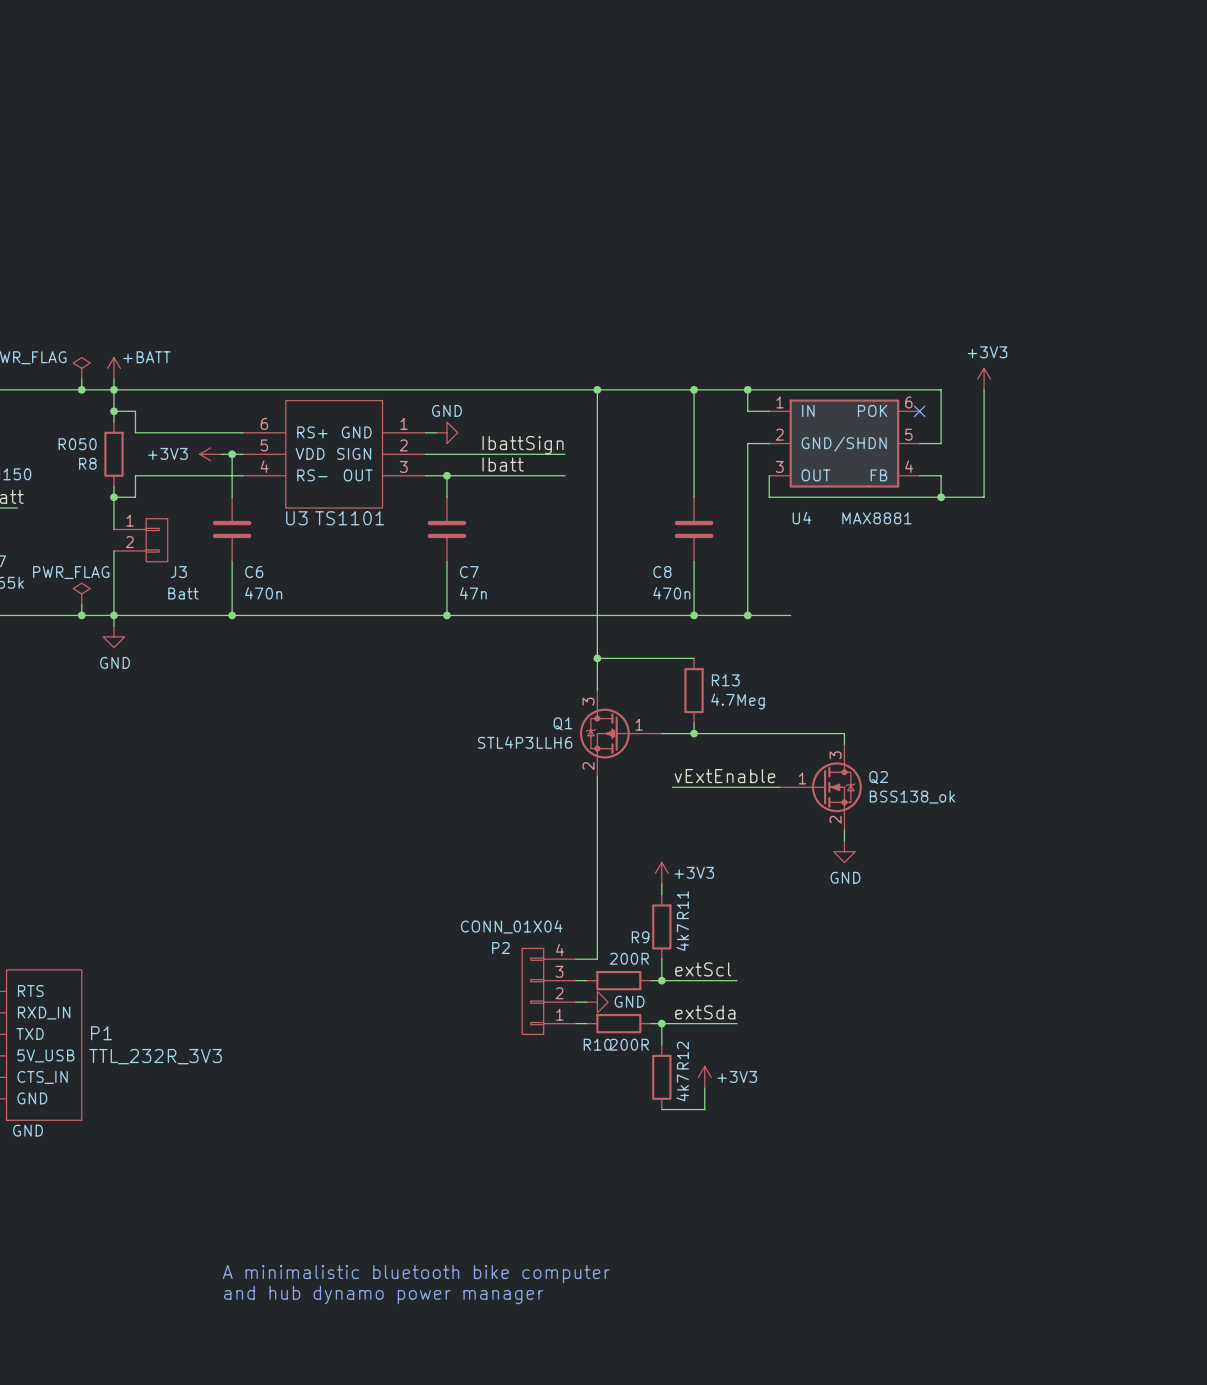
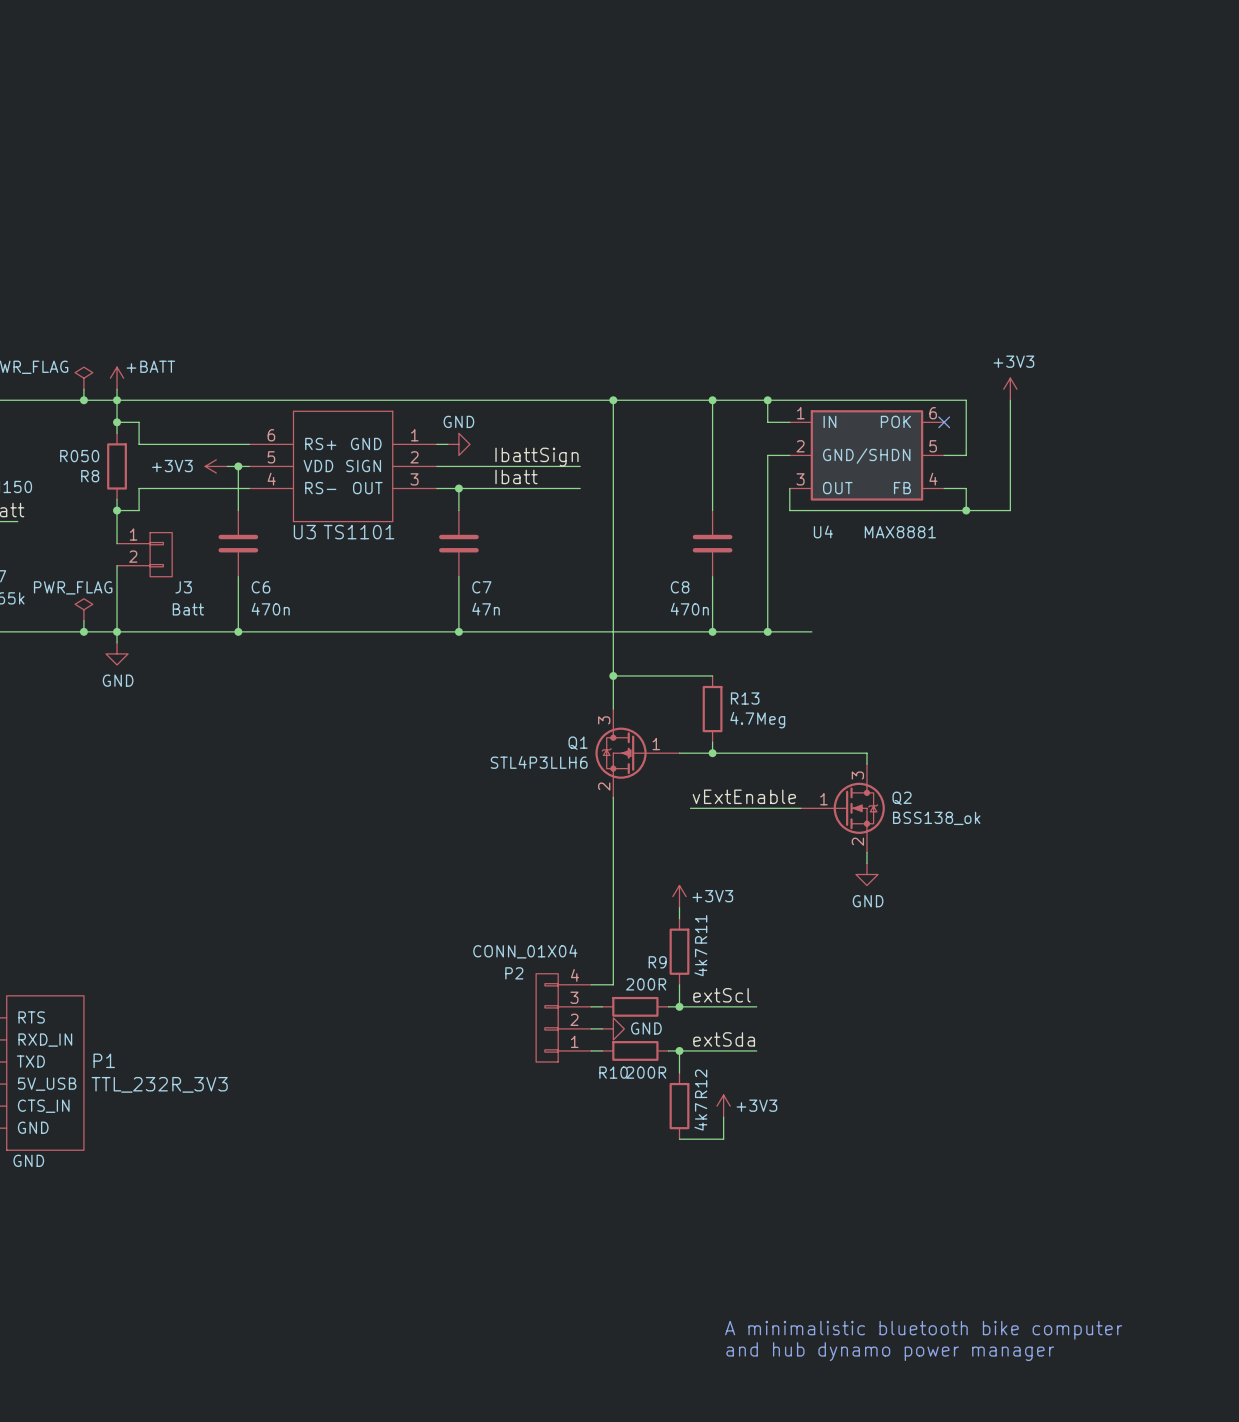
text: A minimalistic bluetooth bike computer (416, 1274) -> none
text: and hub dynamo power manager (383, 1294) -> none
text: none -> A minimalistic bluetooth bike computer (923, 1330)
text: none -> and hub dynamo power manager (890, 1351)

